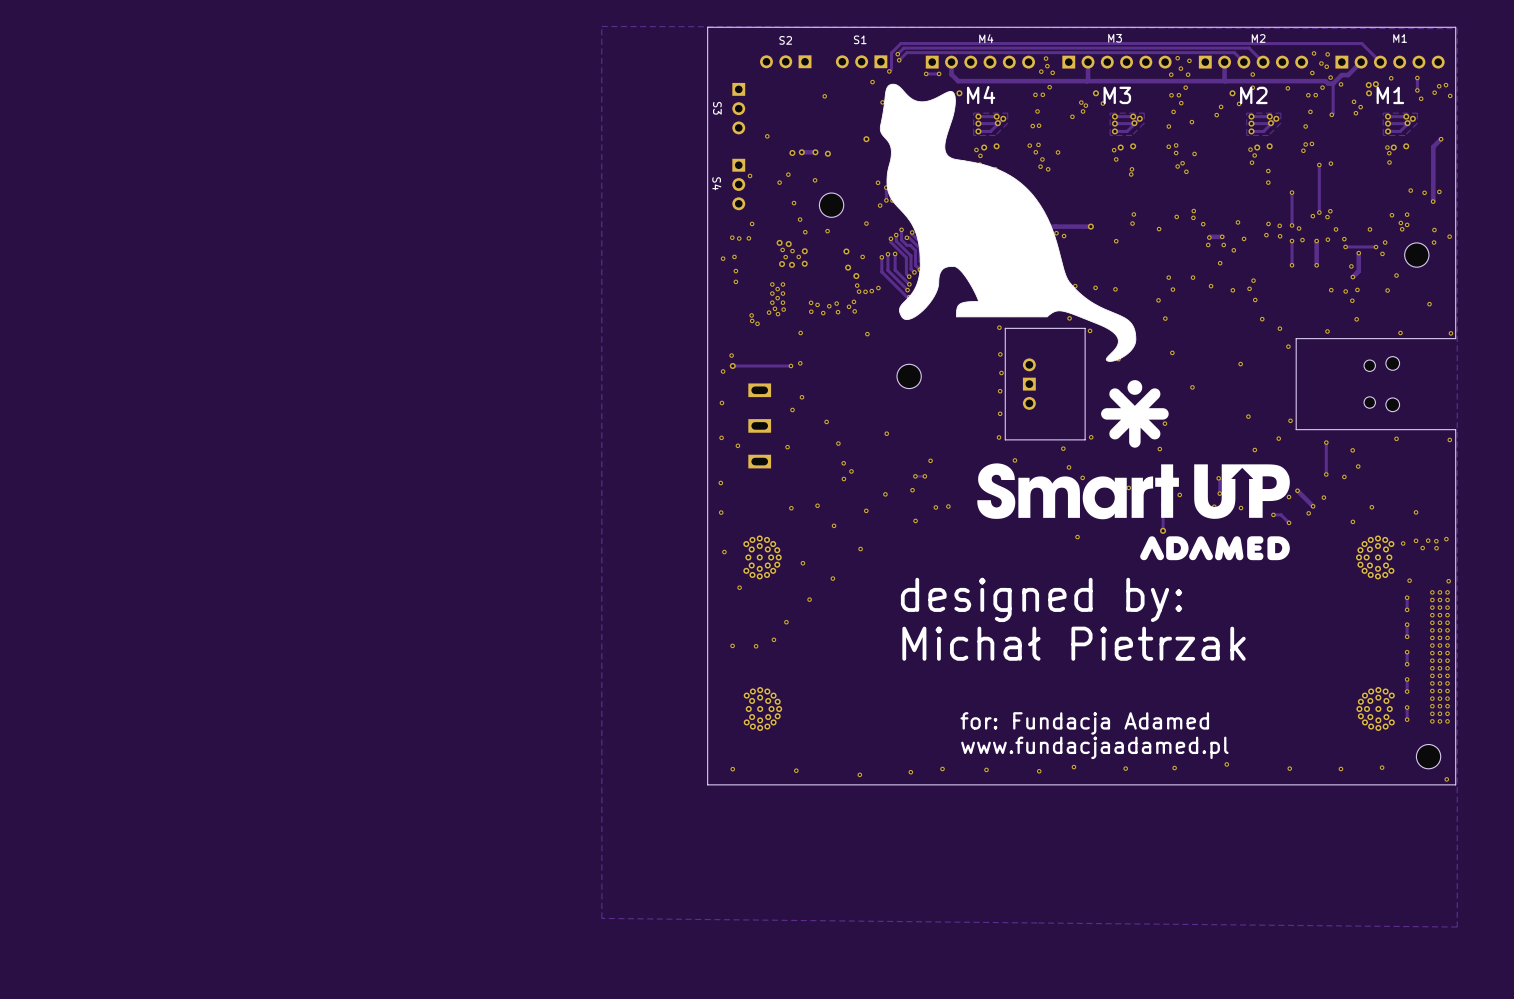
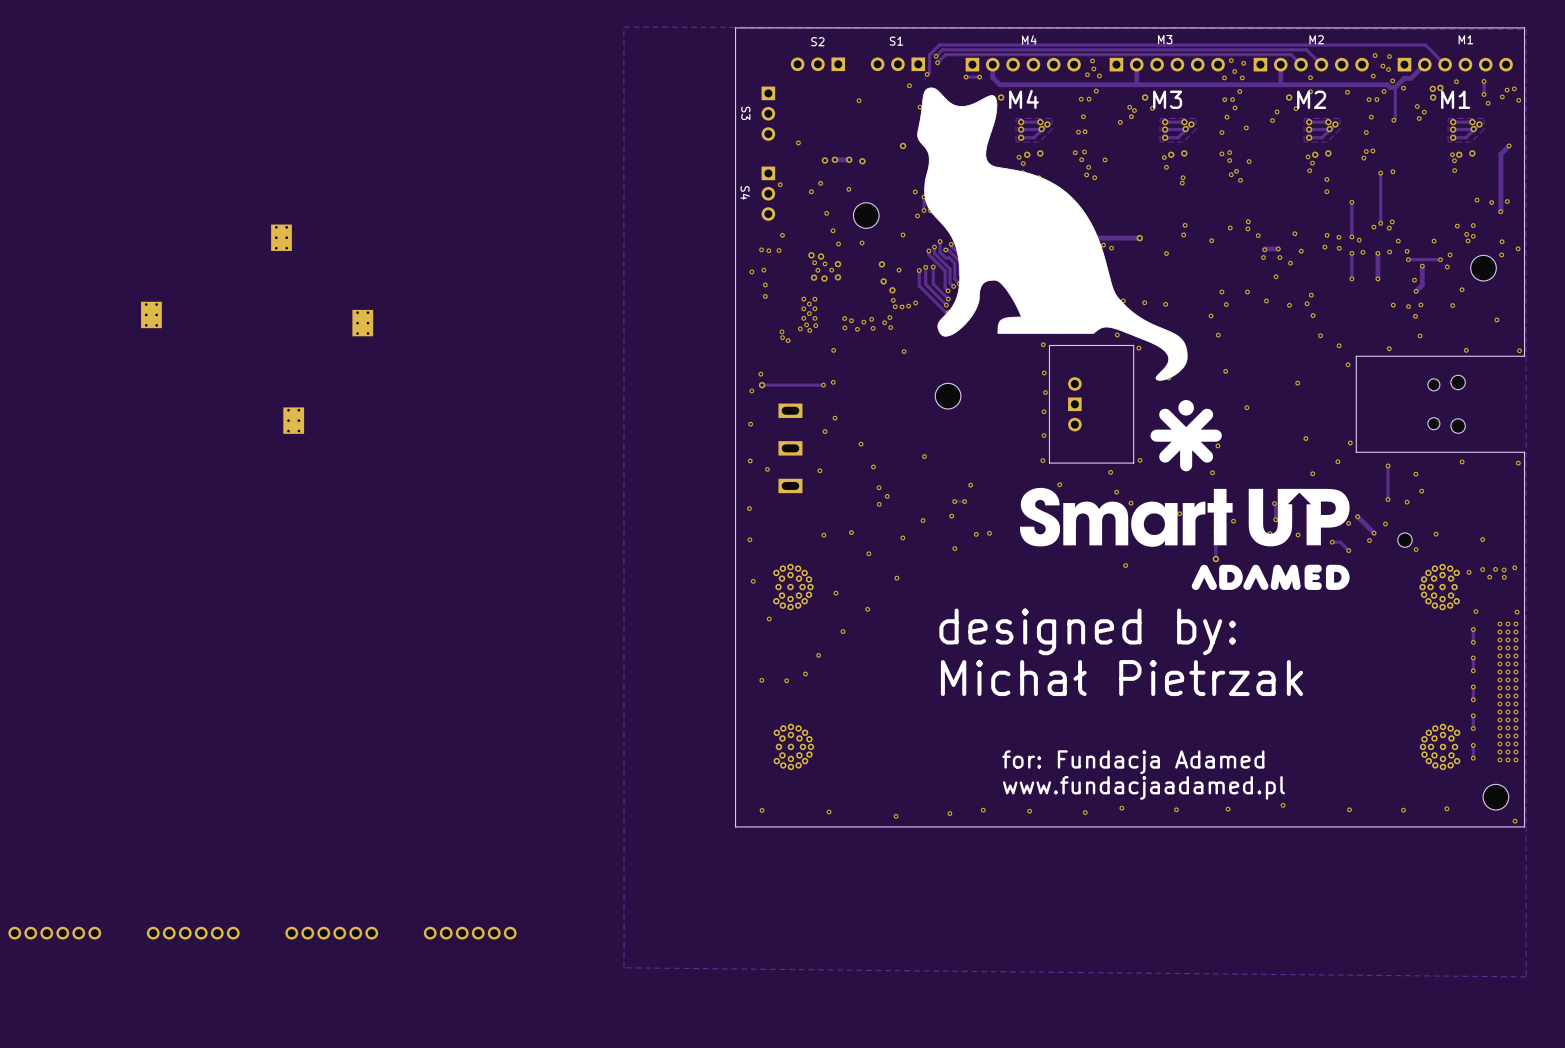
part: none -> (281, 237)
part: none -> (151, 314)
part: none -> (362, 323)
part: none -> (293, 420)
part: none -> (1404, 540)
part: none -> (54, 933)
part: none -> (193, 933)
part: none -> (331, 933)
part: none -> (470, 933)

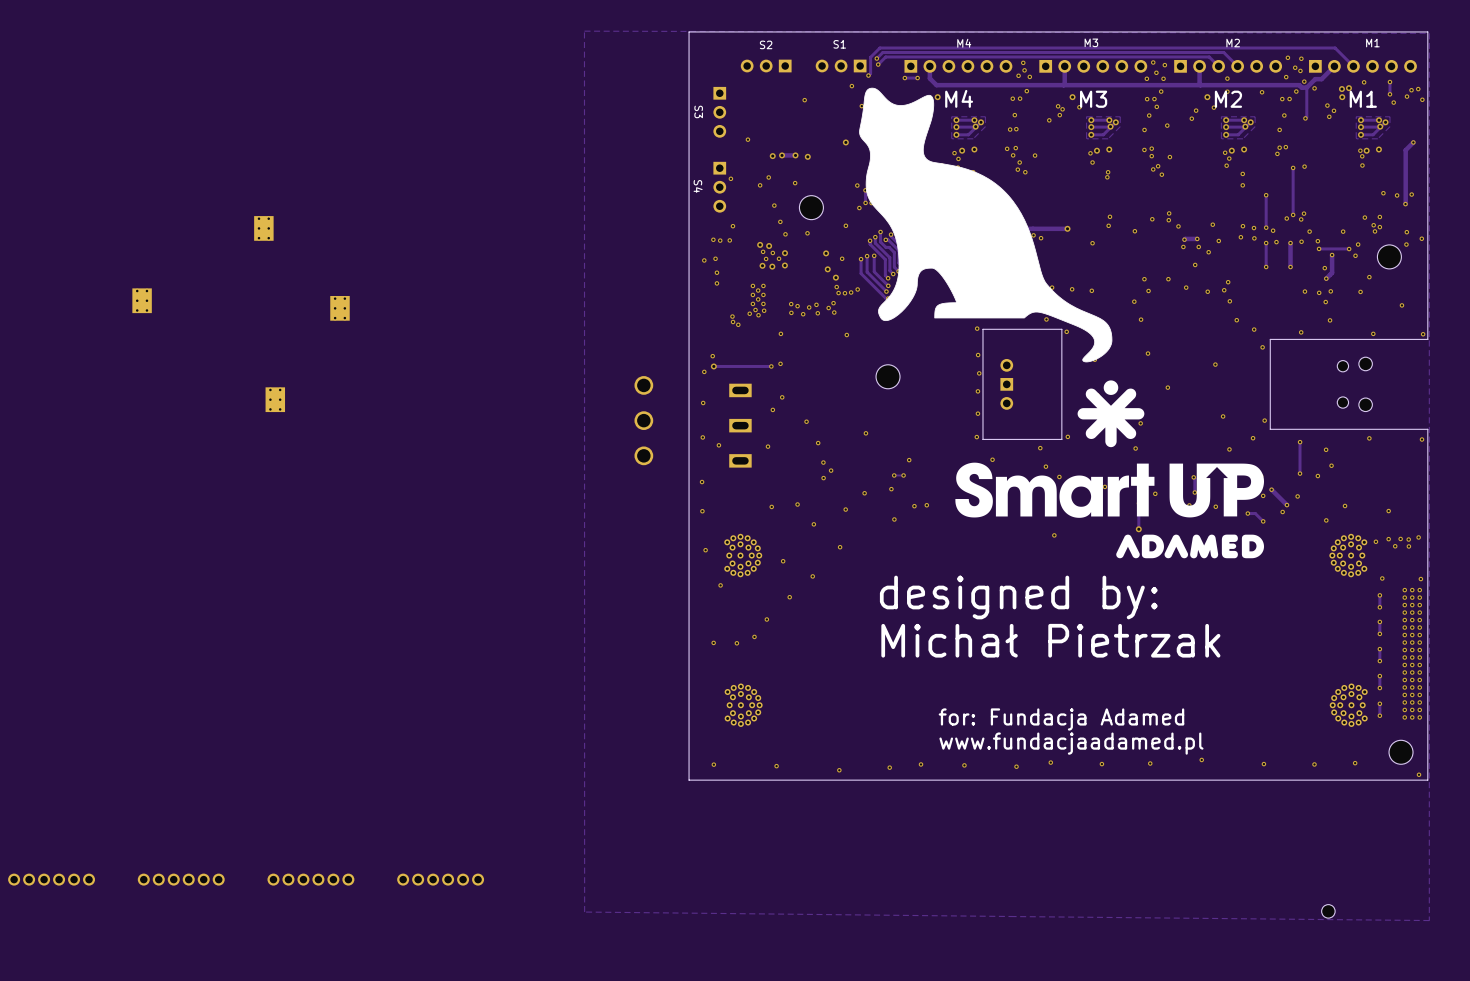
part: none -> (643, 420)
part: (1404, 540) -> none
part: none -> (1328, 911)

